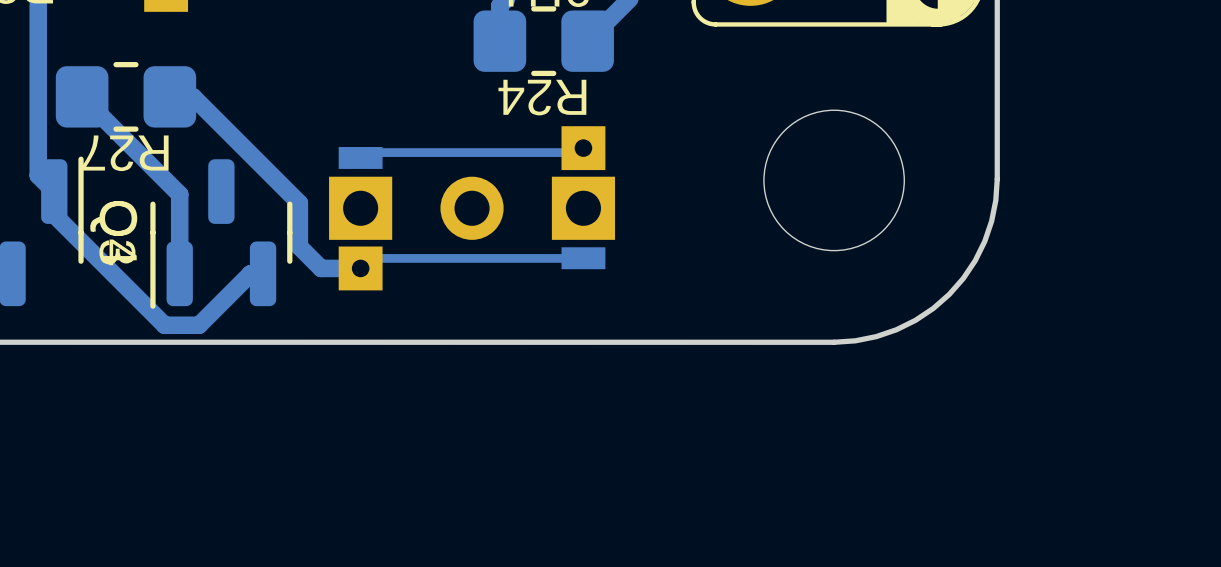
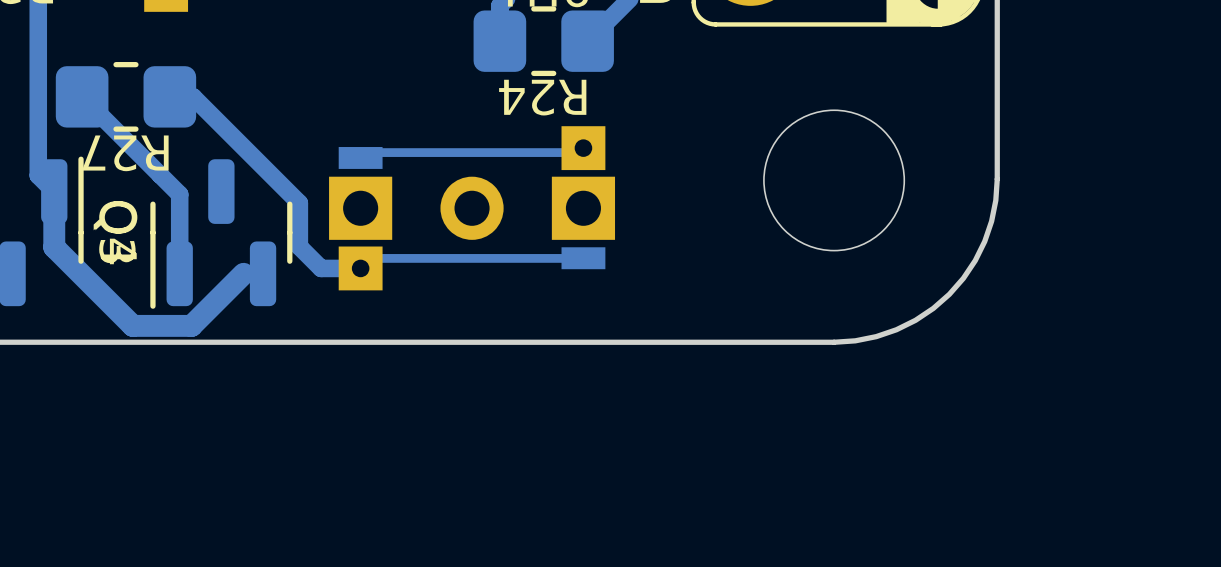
track: (54, 214) (164, 325) (199, 325) (250, 273) (263, 273) -> (54, 214) (54, 247) (132, 325) (191, 325) (243, 273)

